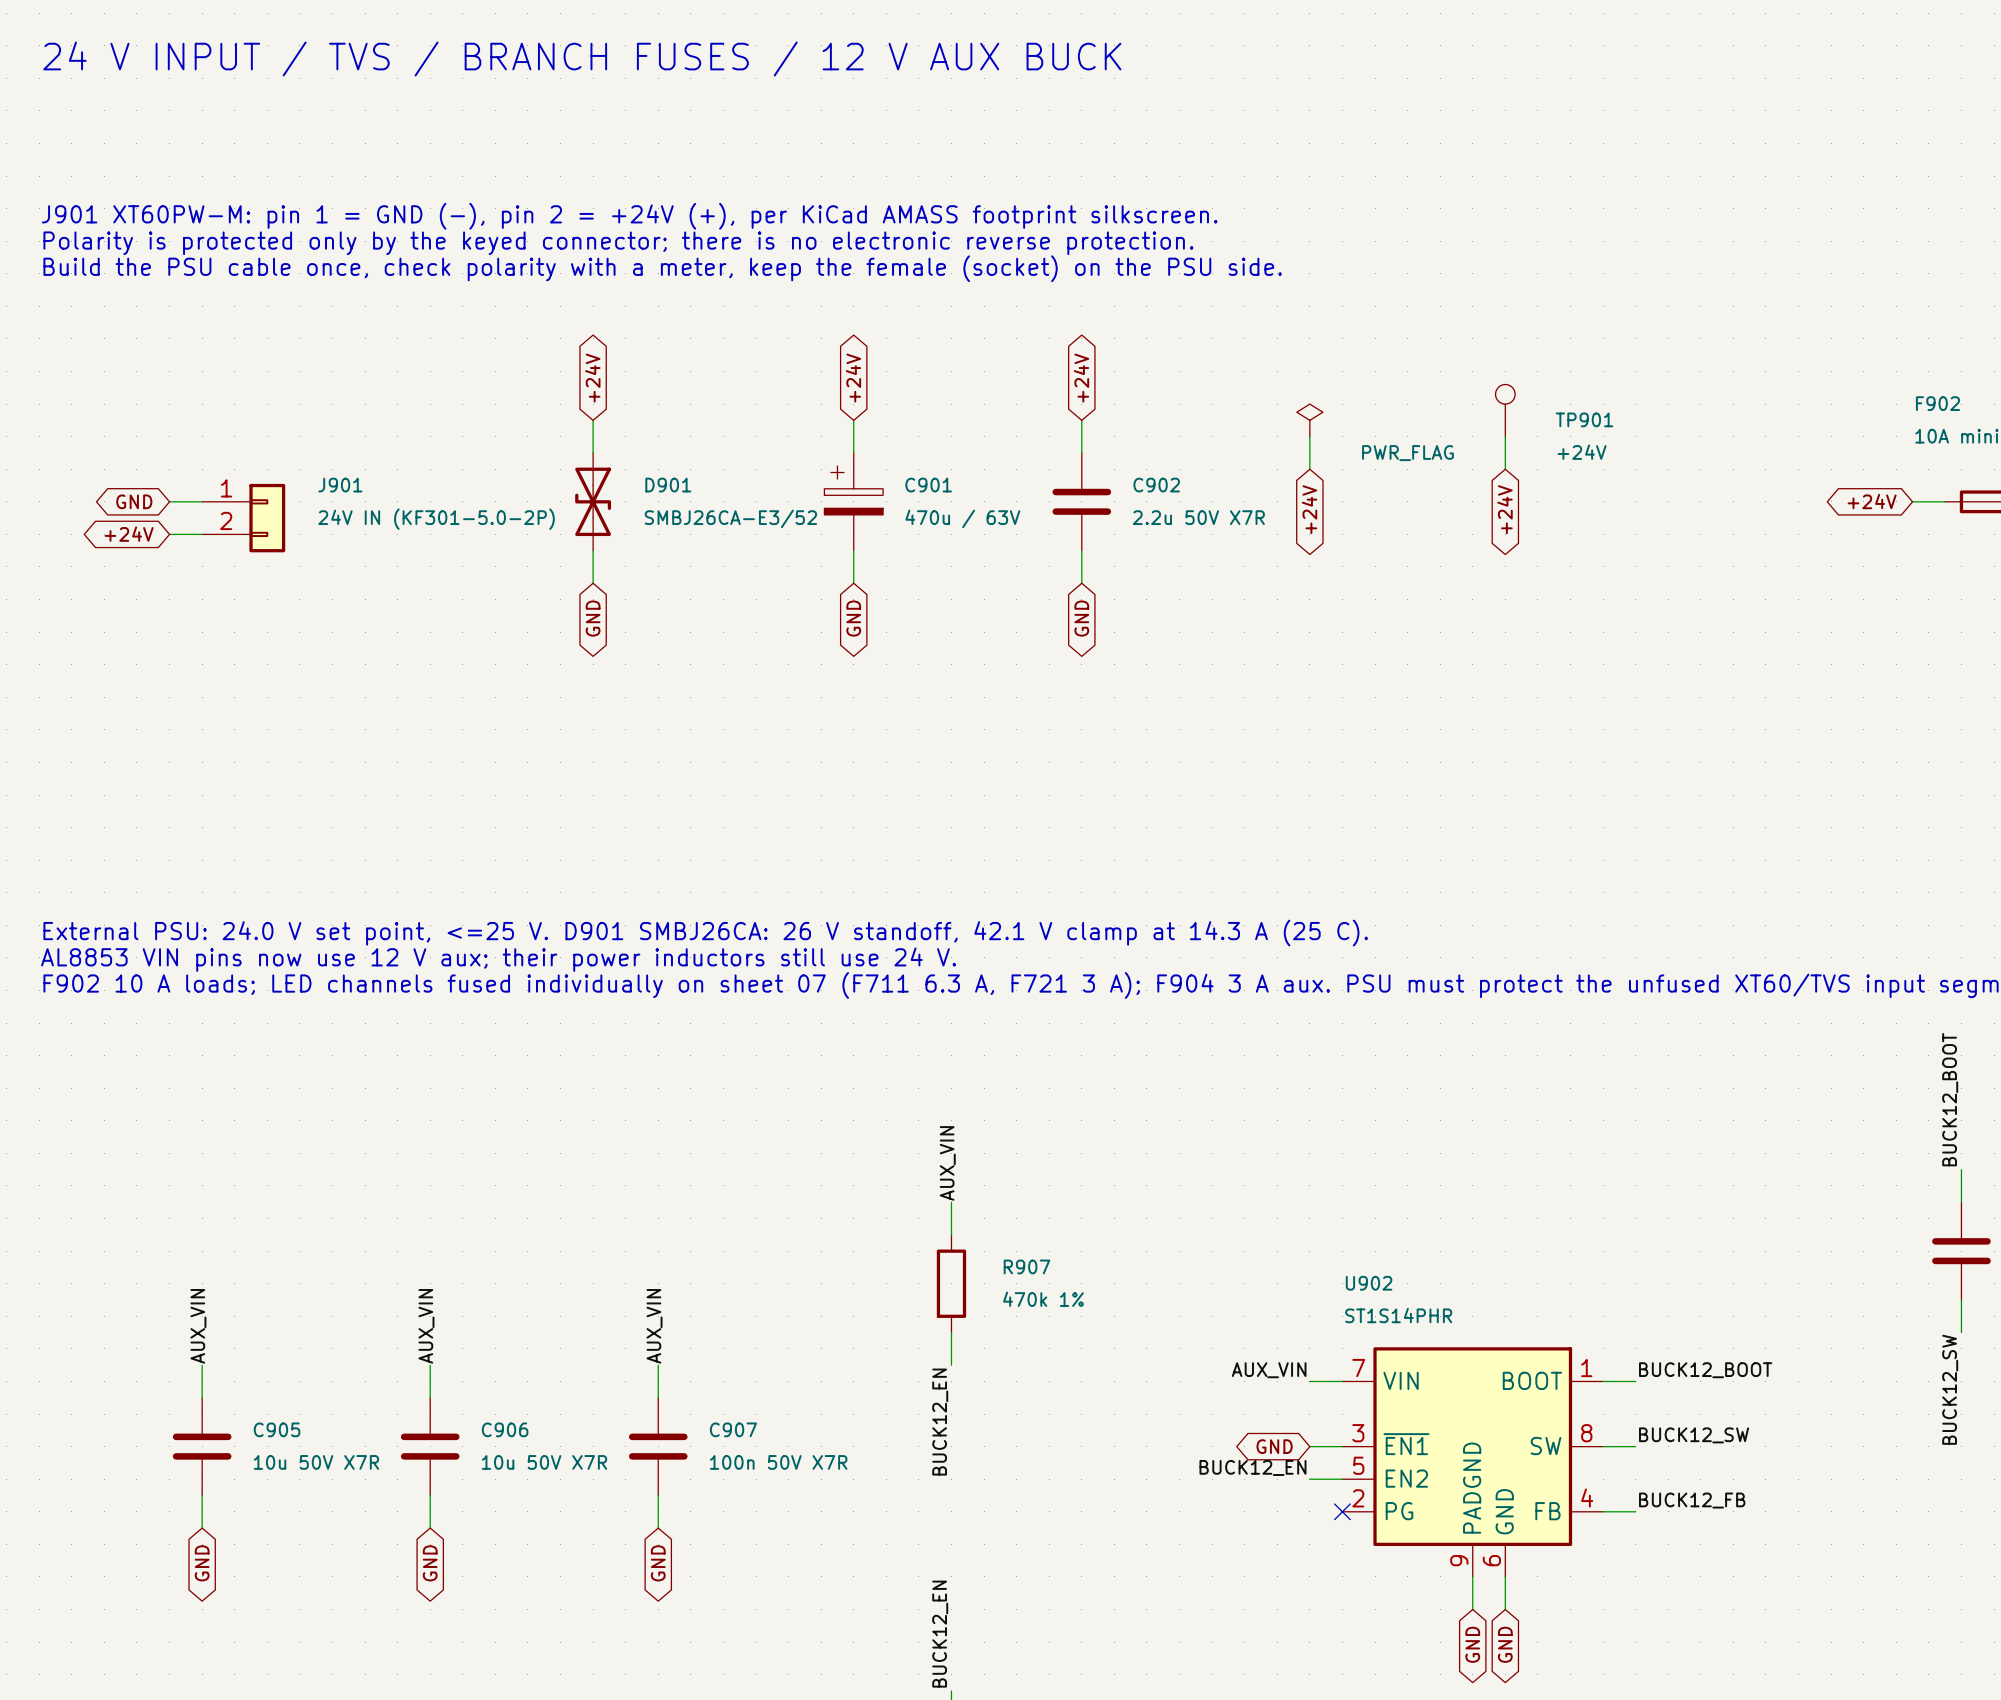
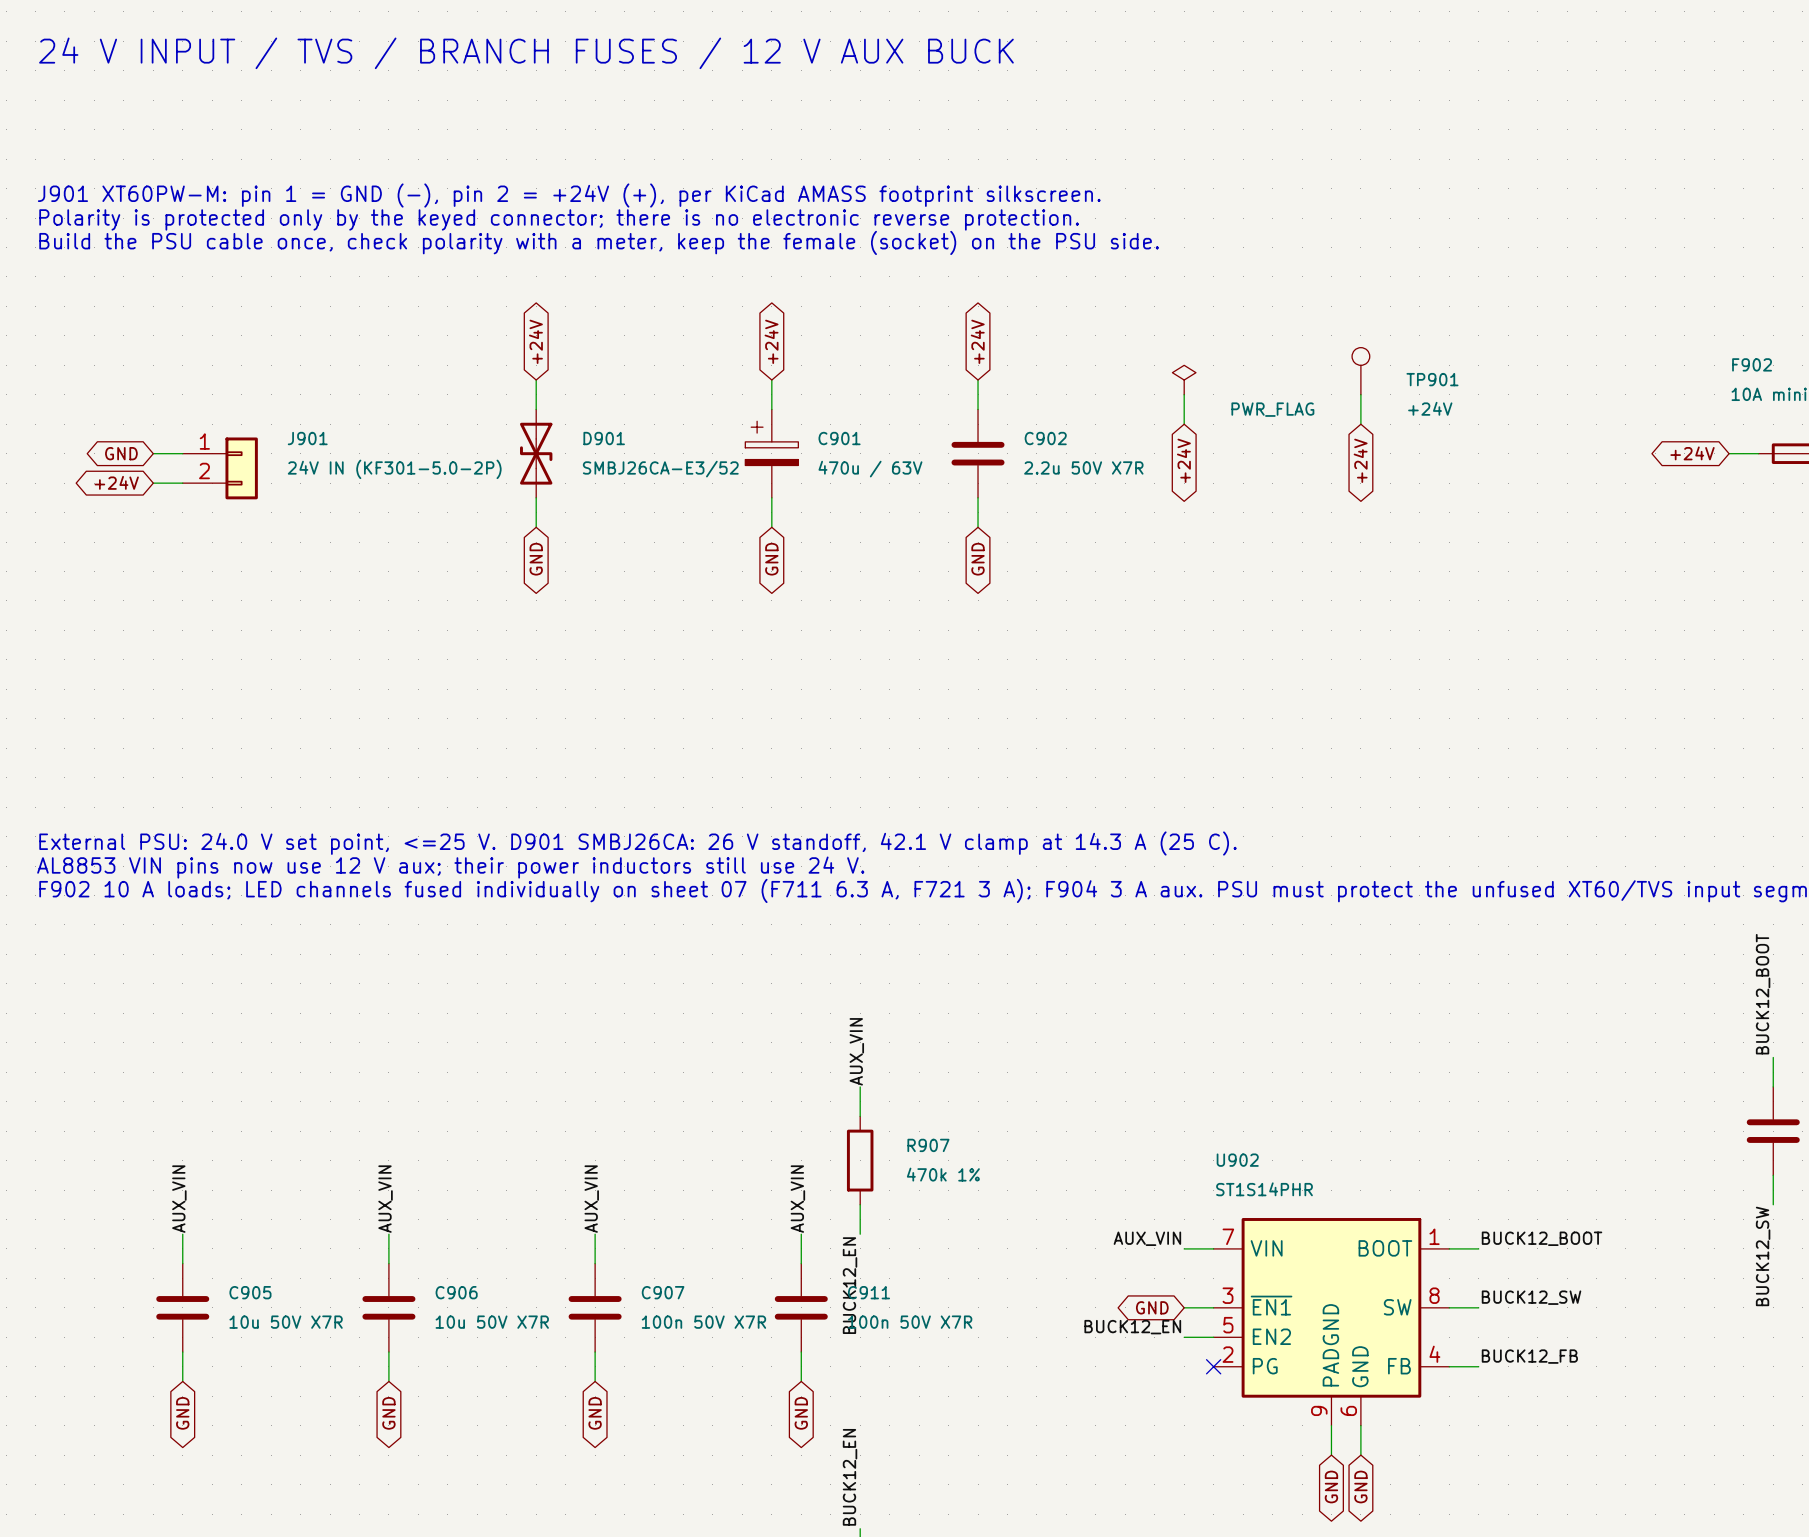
label: none -> AUX_VIN (797, 1199)
wire: none -> (801, 1234) (801, 1263)
C911: none -> 100n 50V X7R (801, 1307)
wire: none -> (801, 1352) (801, 1381)
global label: none -> GND (801, 1413)

